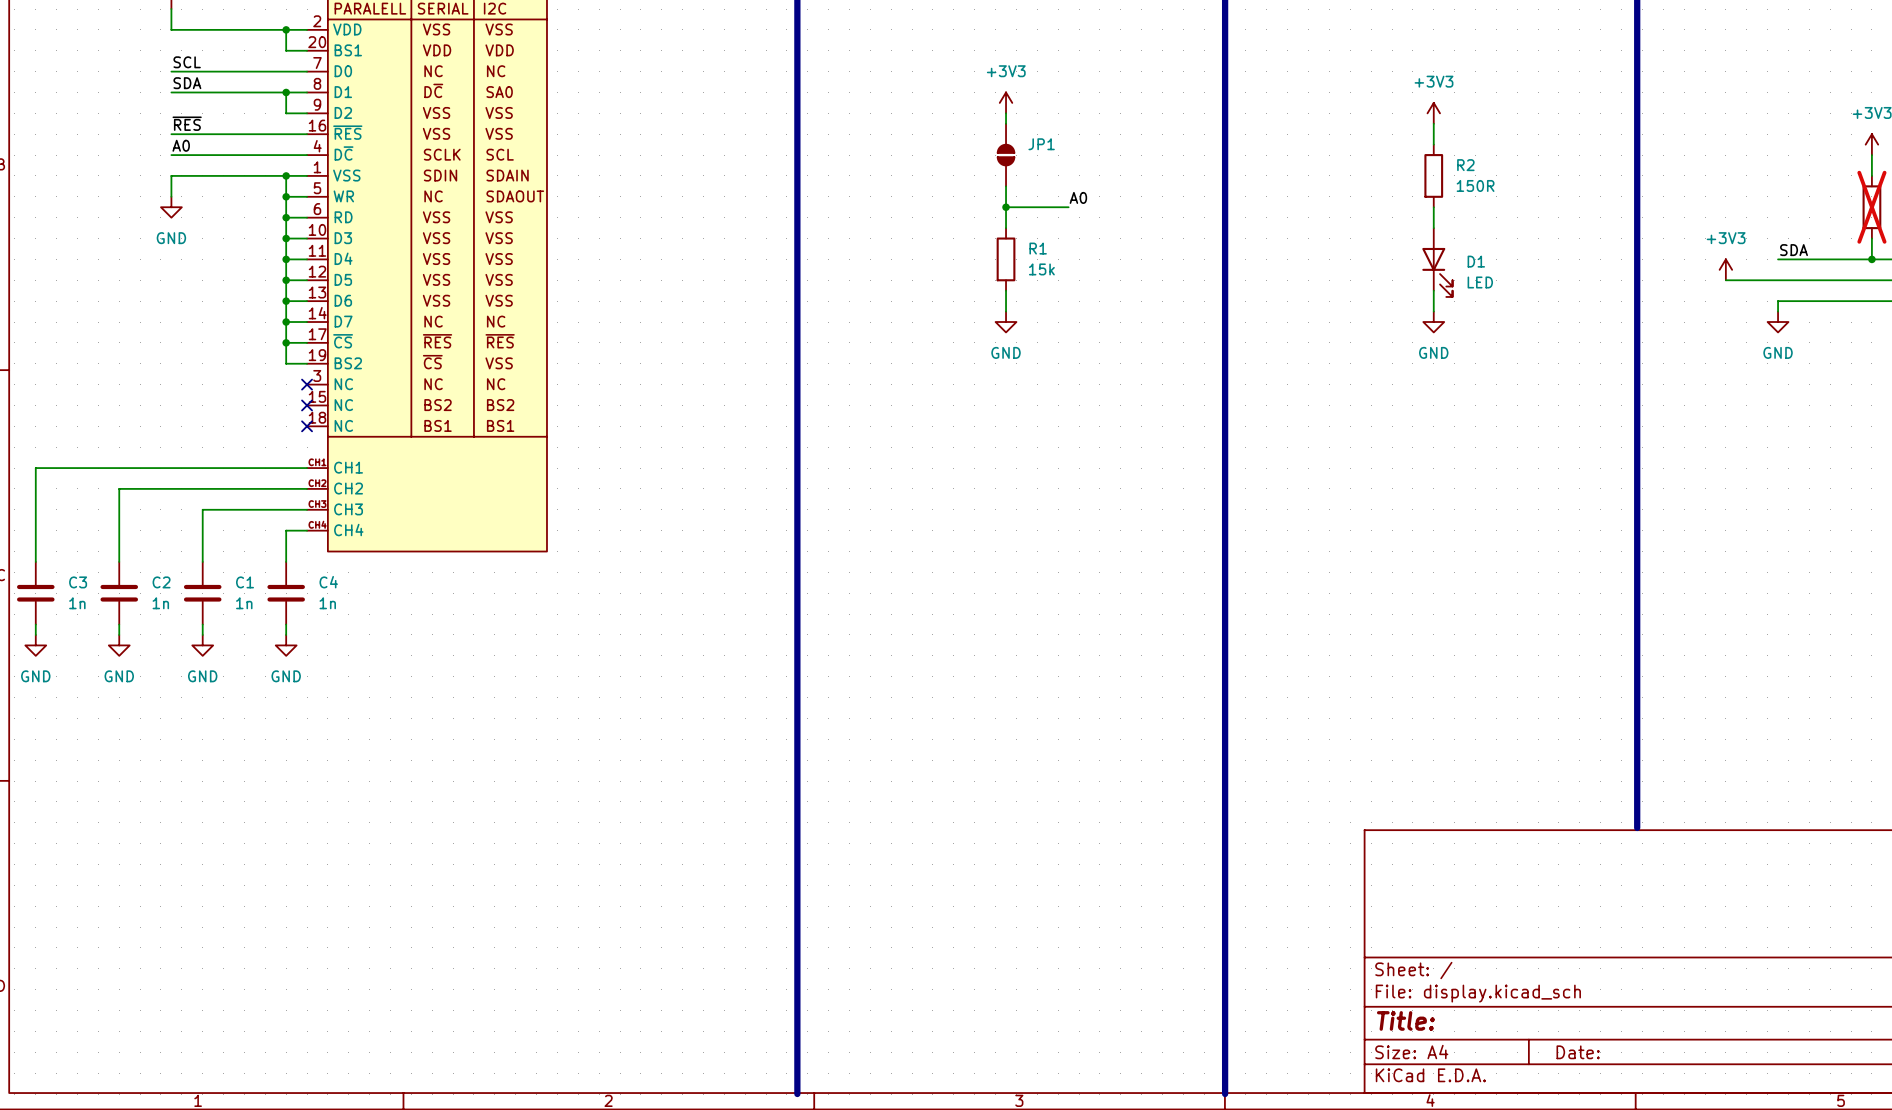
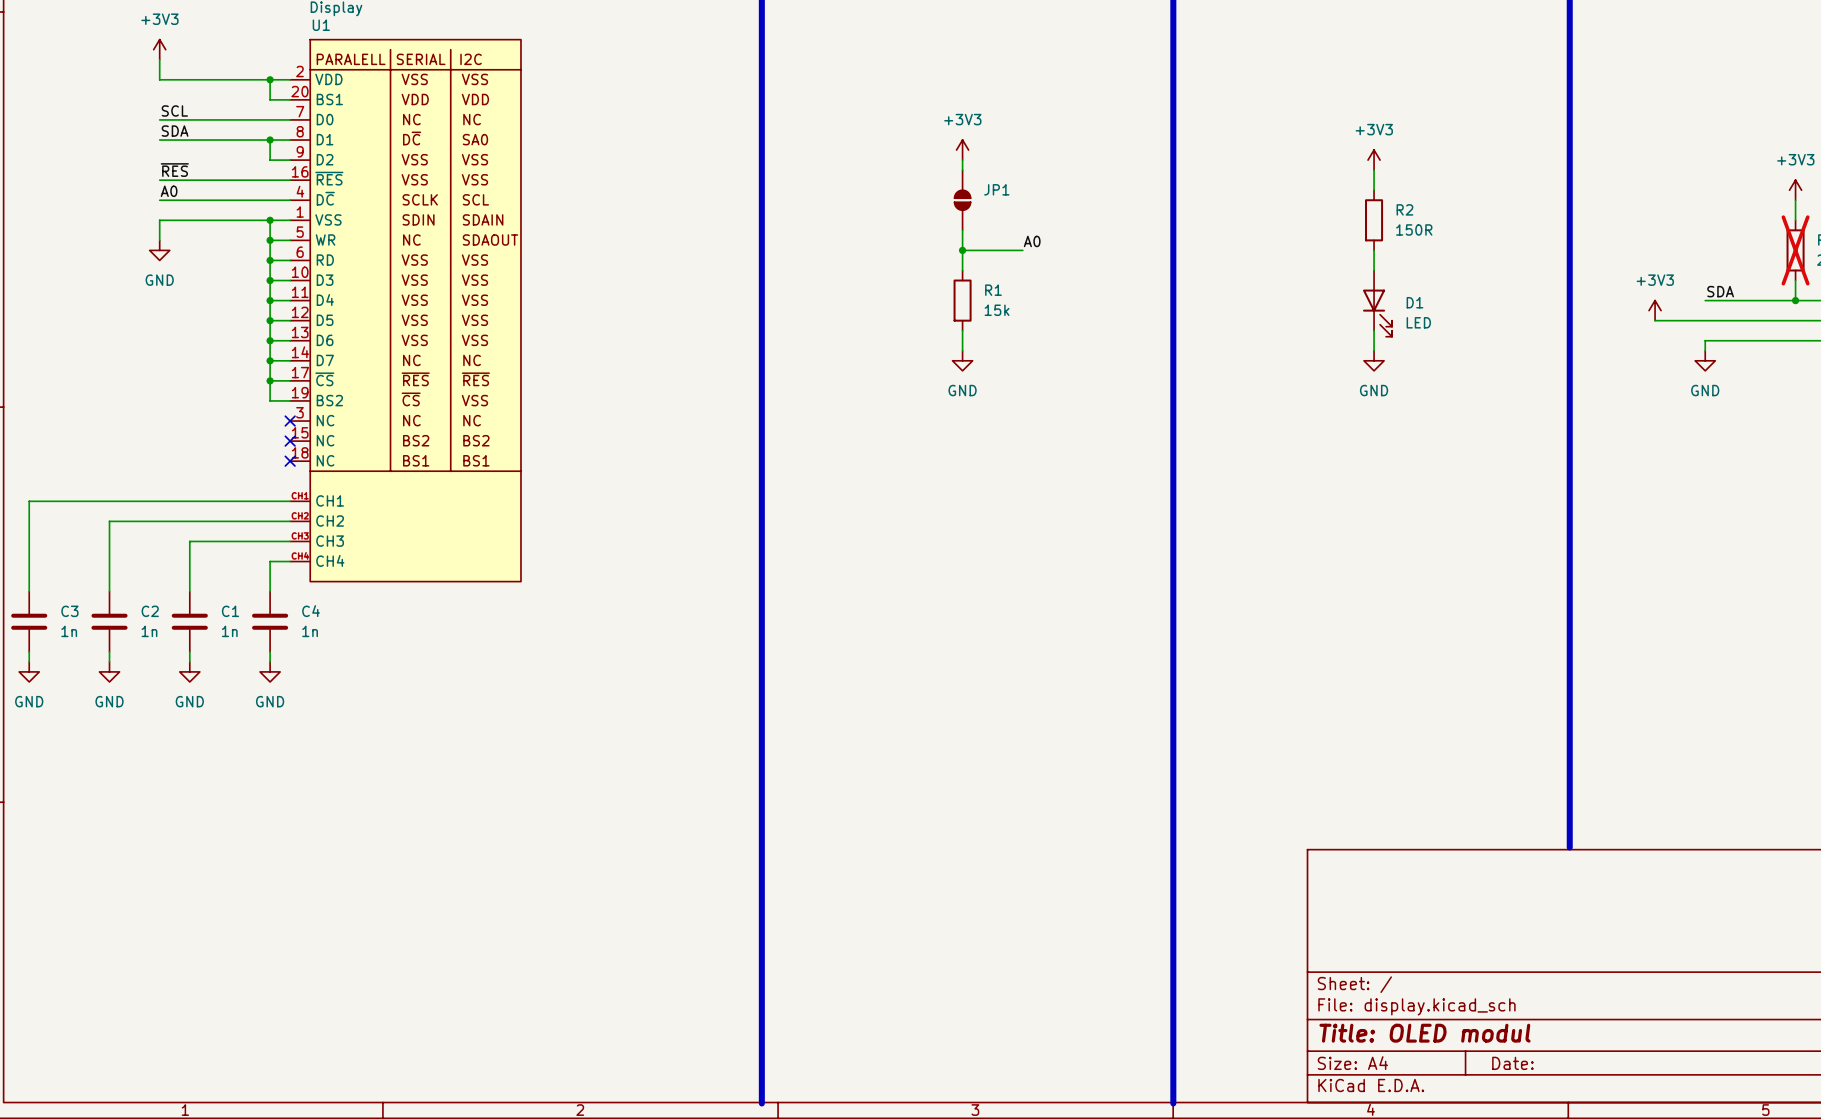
title block: Title: (1405, 1020) -> Title: OLED modul (1424, 1033)

